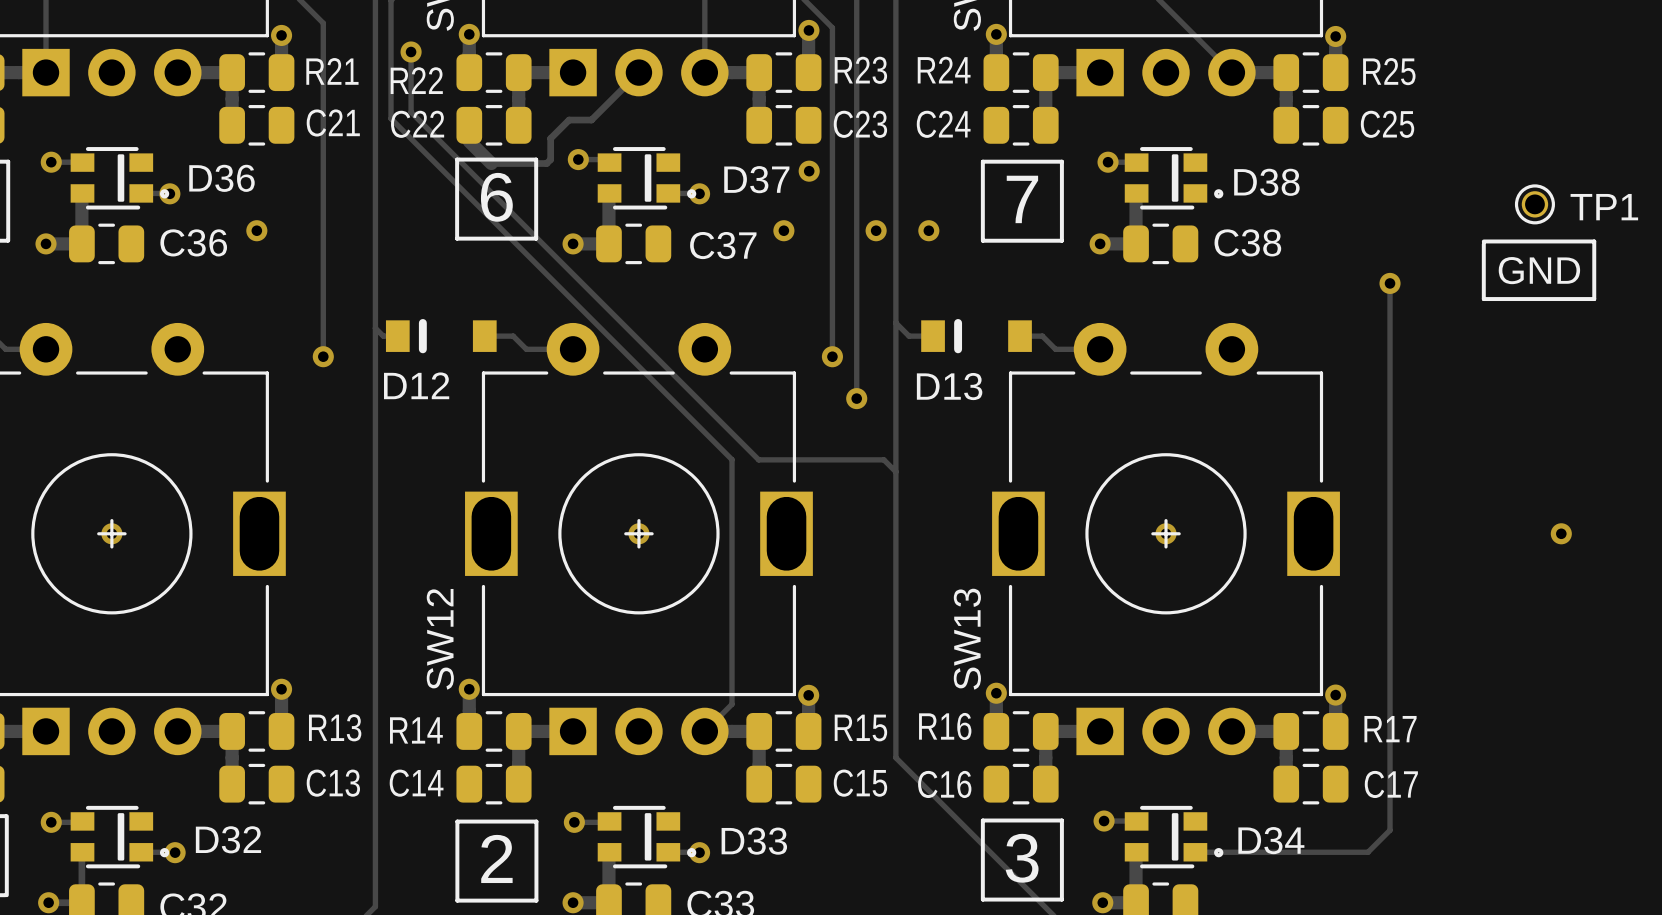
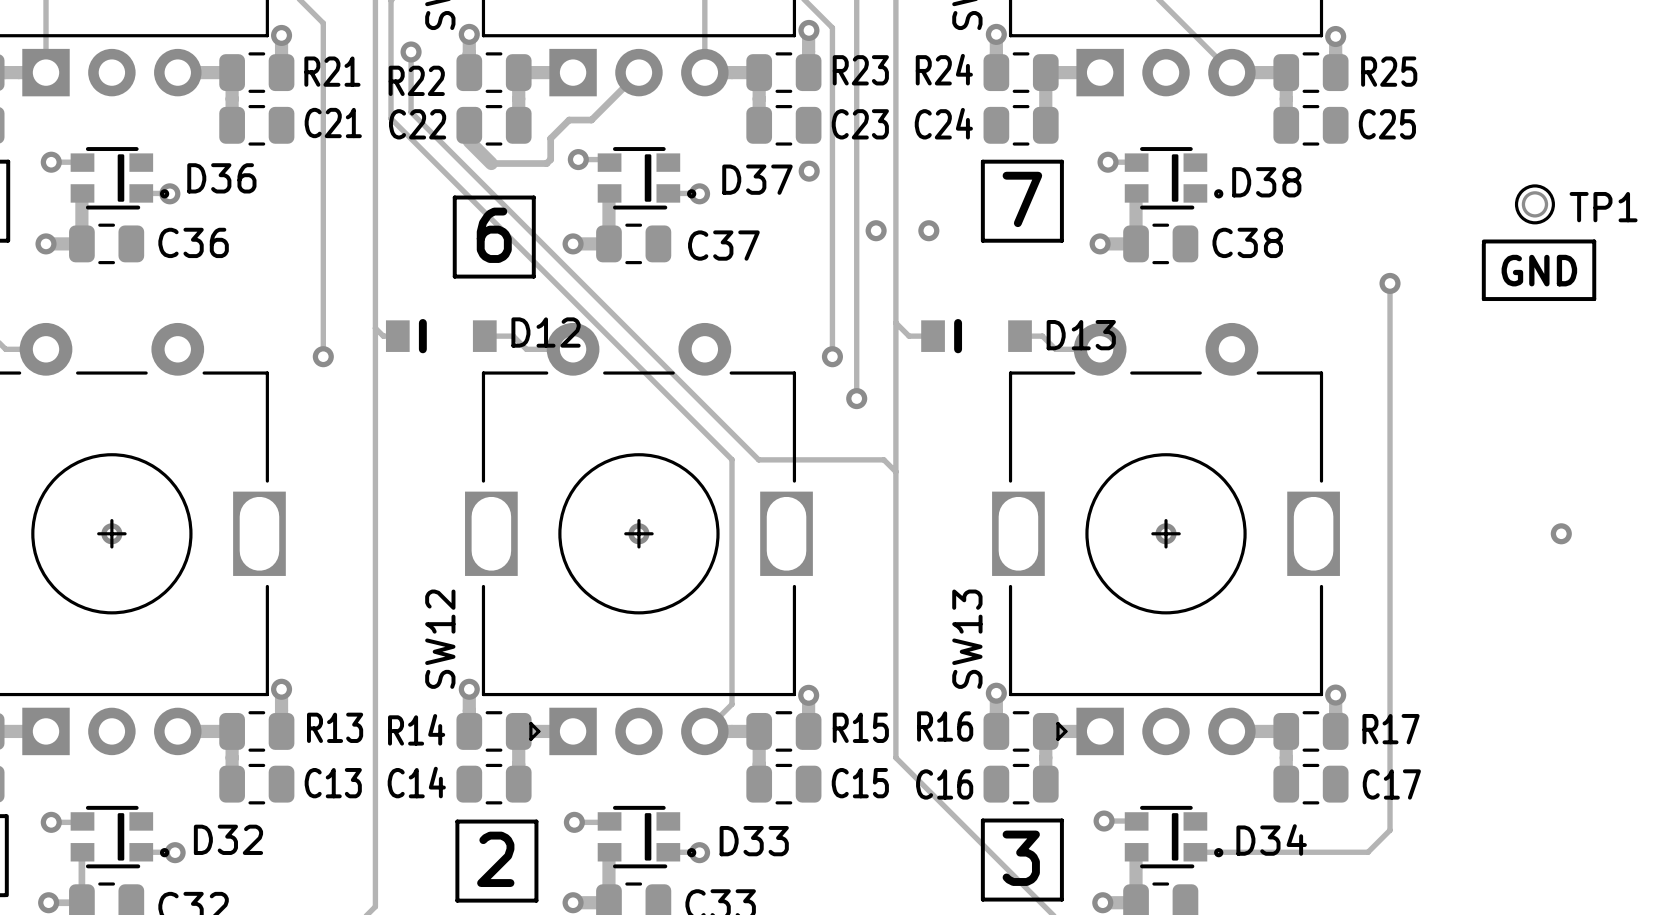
line: (457, 159) (536, 159) (536, 238) (457, 238) (457, 159) -> (454, 197) (533, 197) (533, 276) (454, 276) (454, 197)
text position: 6 (496, 197) -> 6 (494, 235)
via: (256, 230) -> none
via: (783, 230) -> none
SW12 footprint: [465, 322, 813, 756] -> [465, 322, 813, 756]
SW13 footprint: [992, 322, 1340, 756] -> [992, 322, 1340, 756]
D12 name position: D12 (416, 385) -> D12 (546, 332)
D13 name position: D13 (949, 386) -> D13 (1081, 335)

